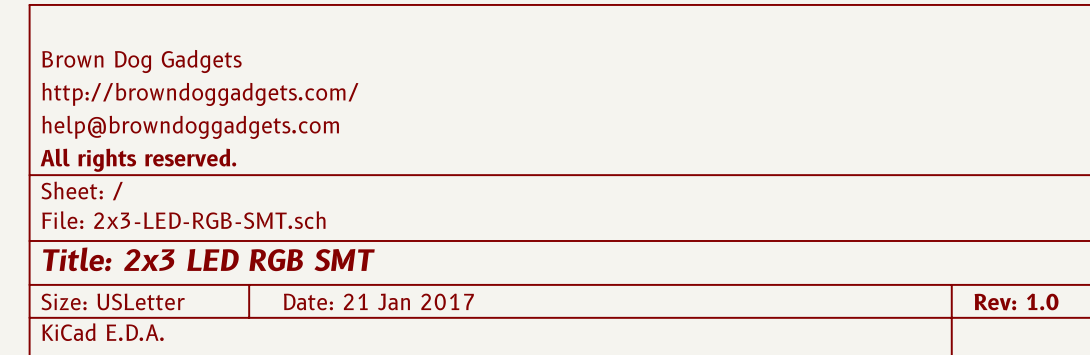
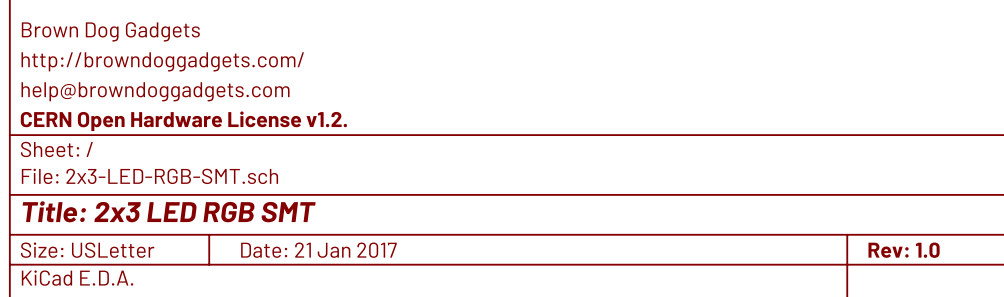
title block: All rights reserved. (138, 160) -> CERN Open Hardware License v1.2. (183, 121)

